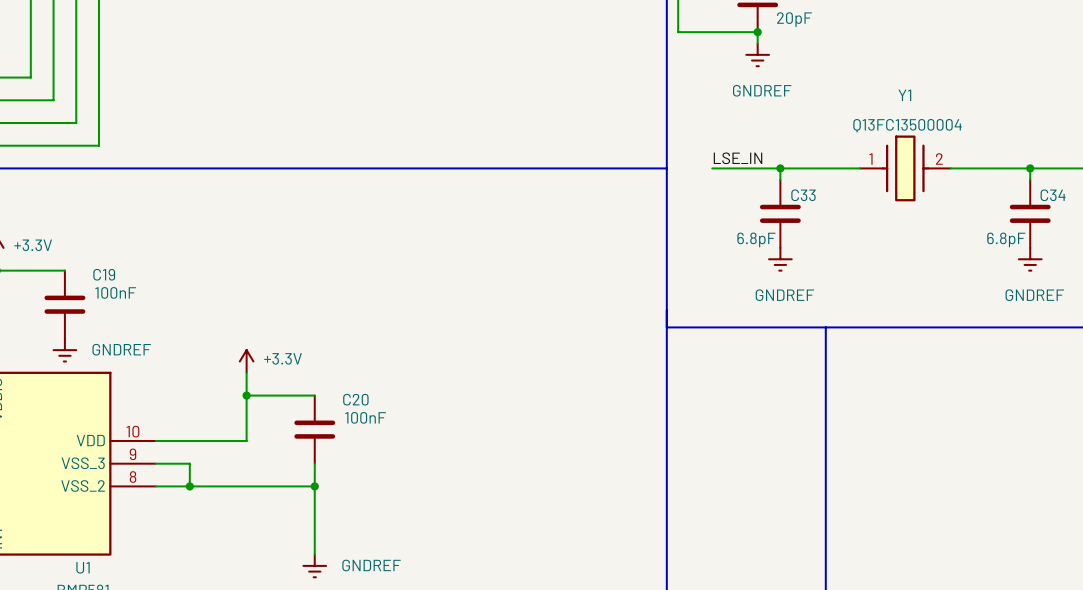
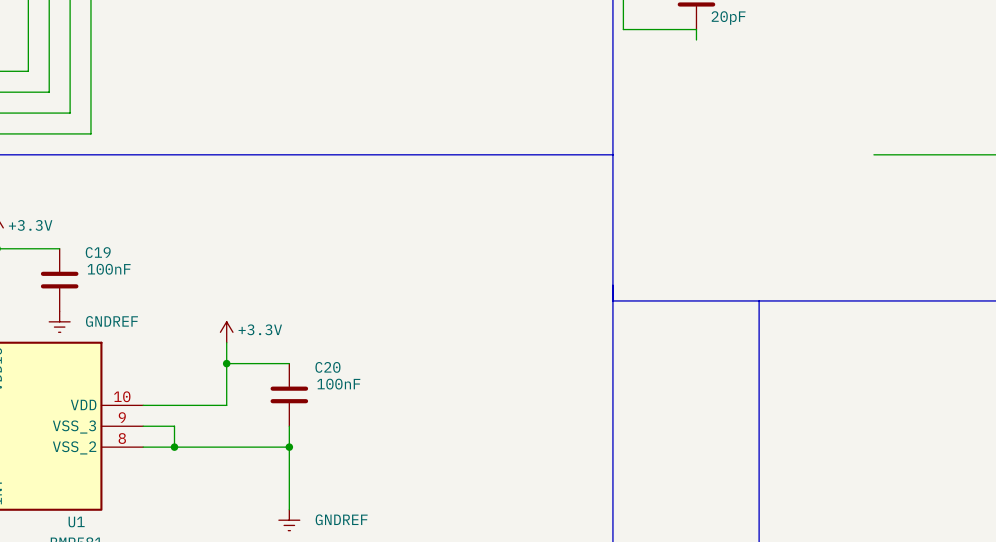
junction: (757, 32) -> none
power symbol: GNDREF (757, 54) -> none
label: LSE_IN (738, 158) -> none
wire: (712, 168) (859, 168) -> none
wire: (780, 168) (780, 179) -> none
junction: (780, 168) -> none
Y1: Q13FC13500004 (905, 168) -> none
wire: (1030, 168) (1030, 179) -> none
junction: (1030, 168) -> none
C33: 6.8pF (780, 213) -> none
C34: 6.8pF (1030, 213) -> none
power symbol: GNDREF (780, 259) -> none
power symbol: GNDREF (1030, 259) -> none

